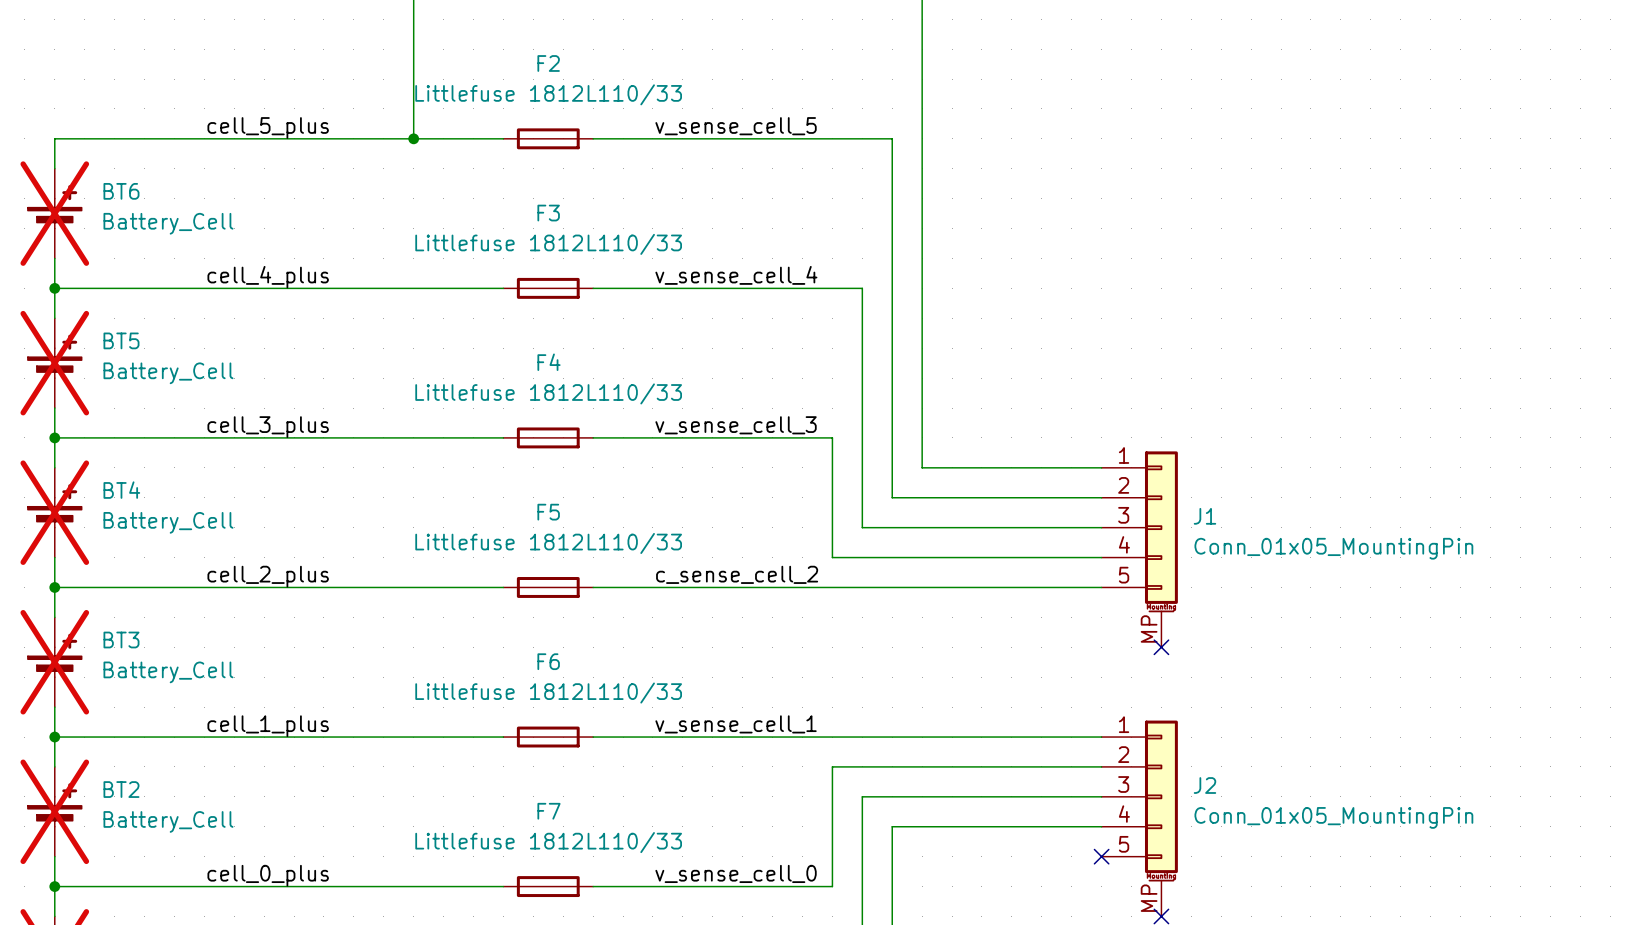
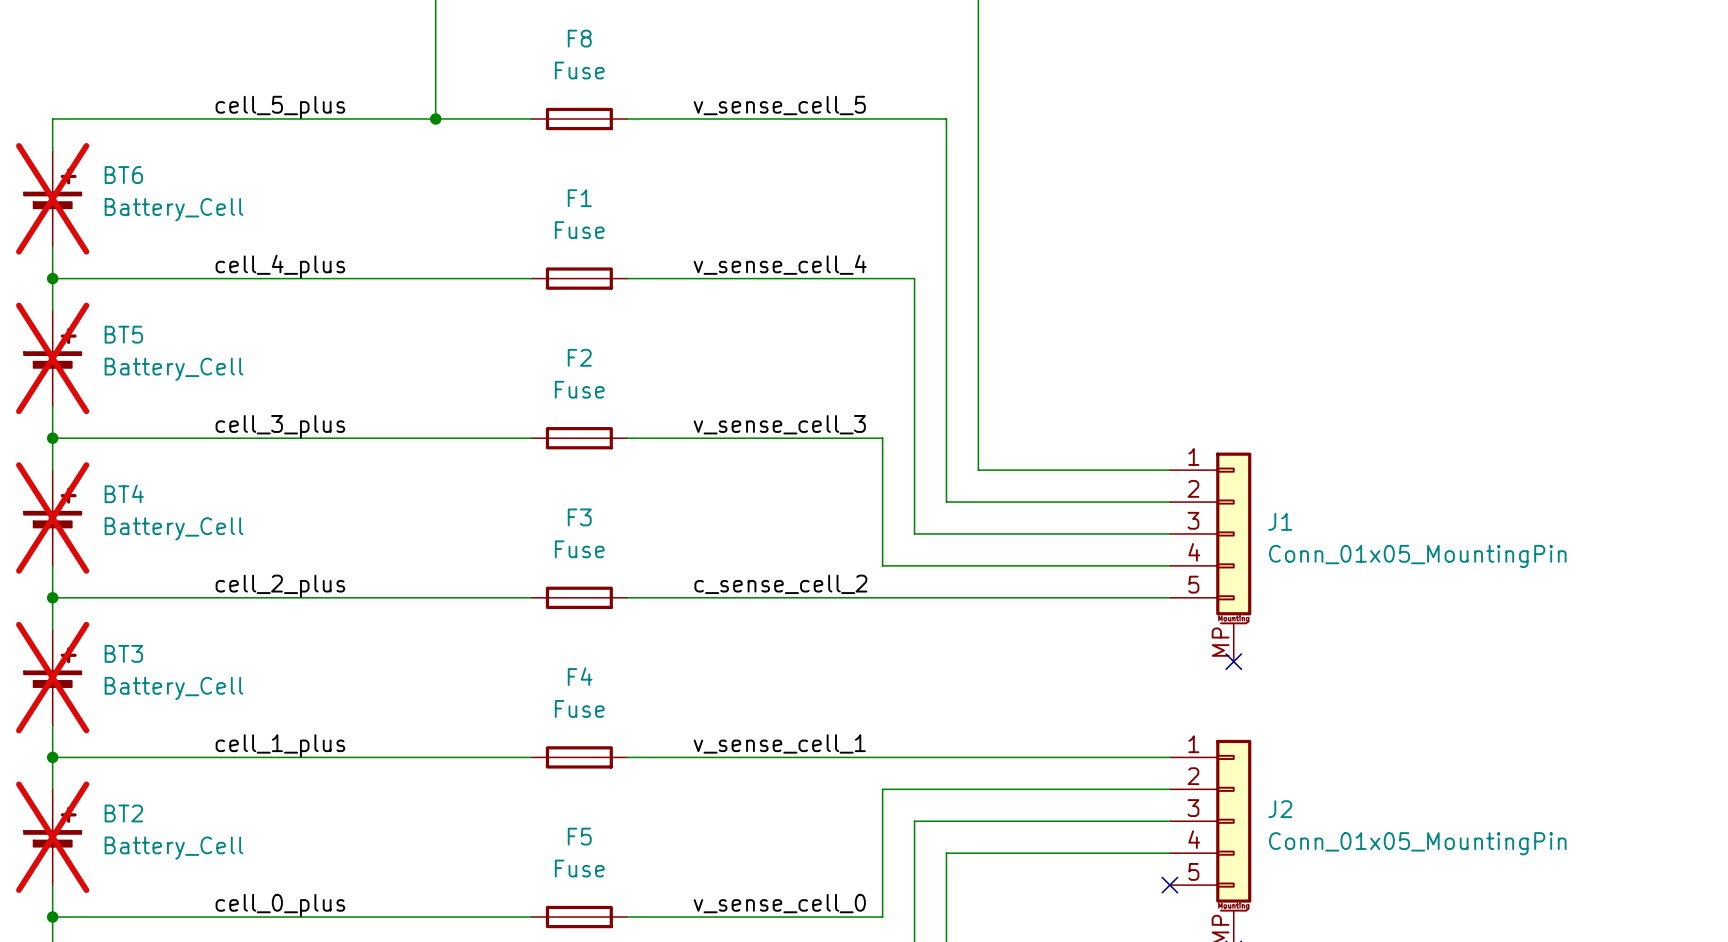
F2 name: F2 (548, 63) -> F8 (579, 38)
F2 value: Littlefuse 1812L110/33 (548, 94) -> Fuse (579, 70)
F3 name: F3 (548, 213) -> F1 (579, 198)
F3 value: Littlefuse 1812L110/33 (548, 244) -> Fuse (579, 230)
F4 name: F4 (549, 362) -> F2 (579, 357)
F4 value: Littlefuse 1812L110/33 (548, 393) -> Fuse (579, 389)
F5 name: F5 (548, 512) -> F3 (579, 517)
F5 value: Littlefuse 1812L110/33 (548, 543) -> Fuse (579, 549)
F6 name: F6 (548, 661) -> F4 (580, 676)
F6 value: Littlefuse 1812L110/33 (548, 693) -> Fuse (579, 708)
F7 name: F7 (549, 811) -> F5 (579, 836)
F7 value: Littlefuse 1812L110/33 (548, 842) -> Fuse (579, 868)

